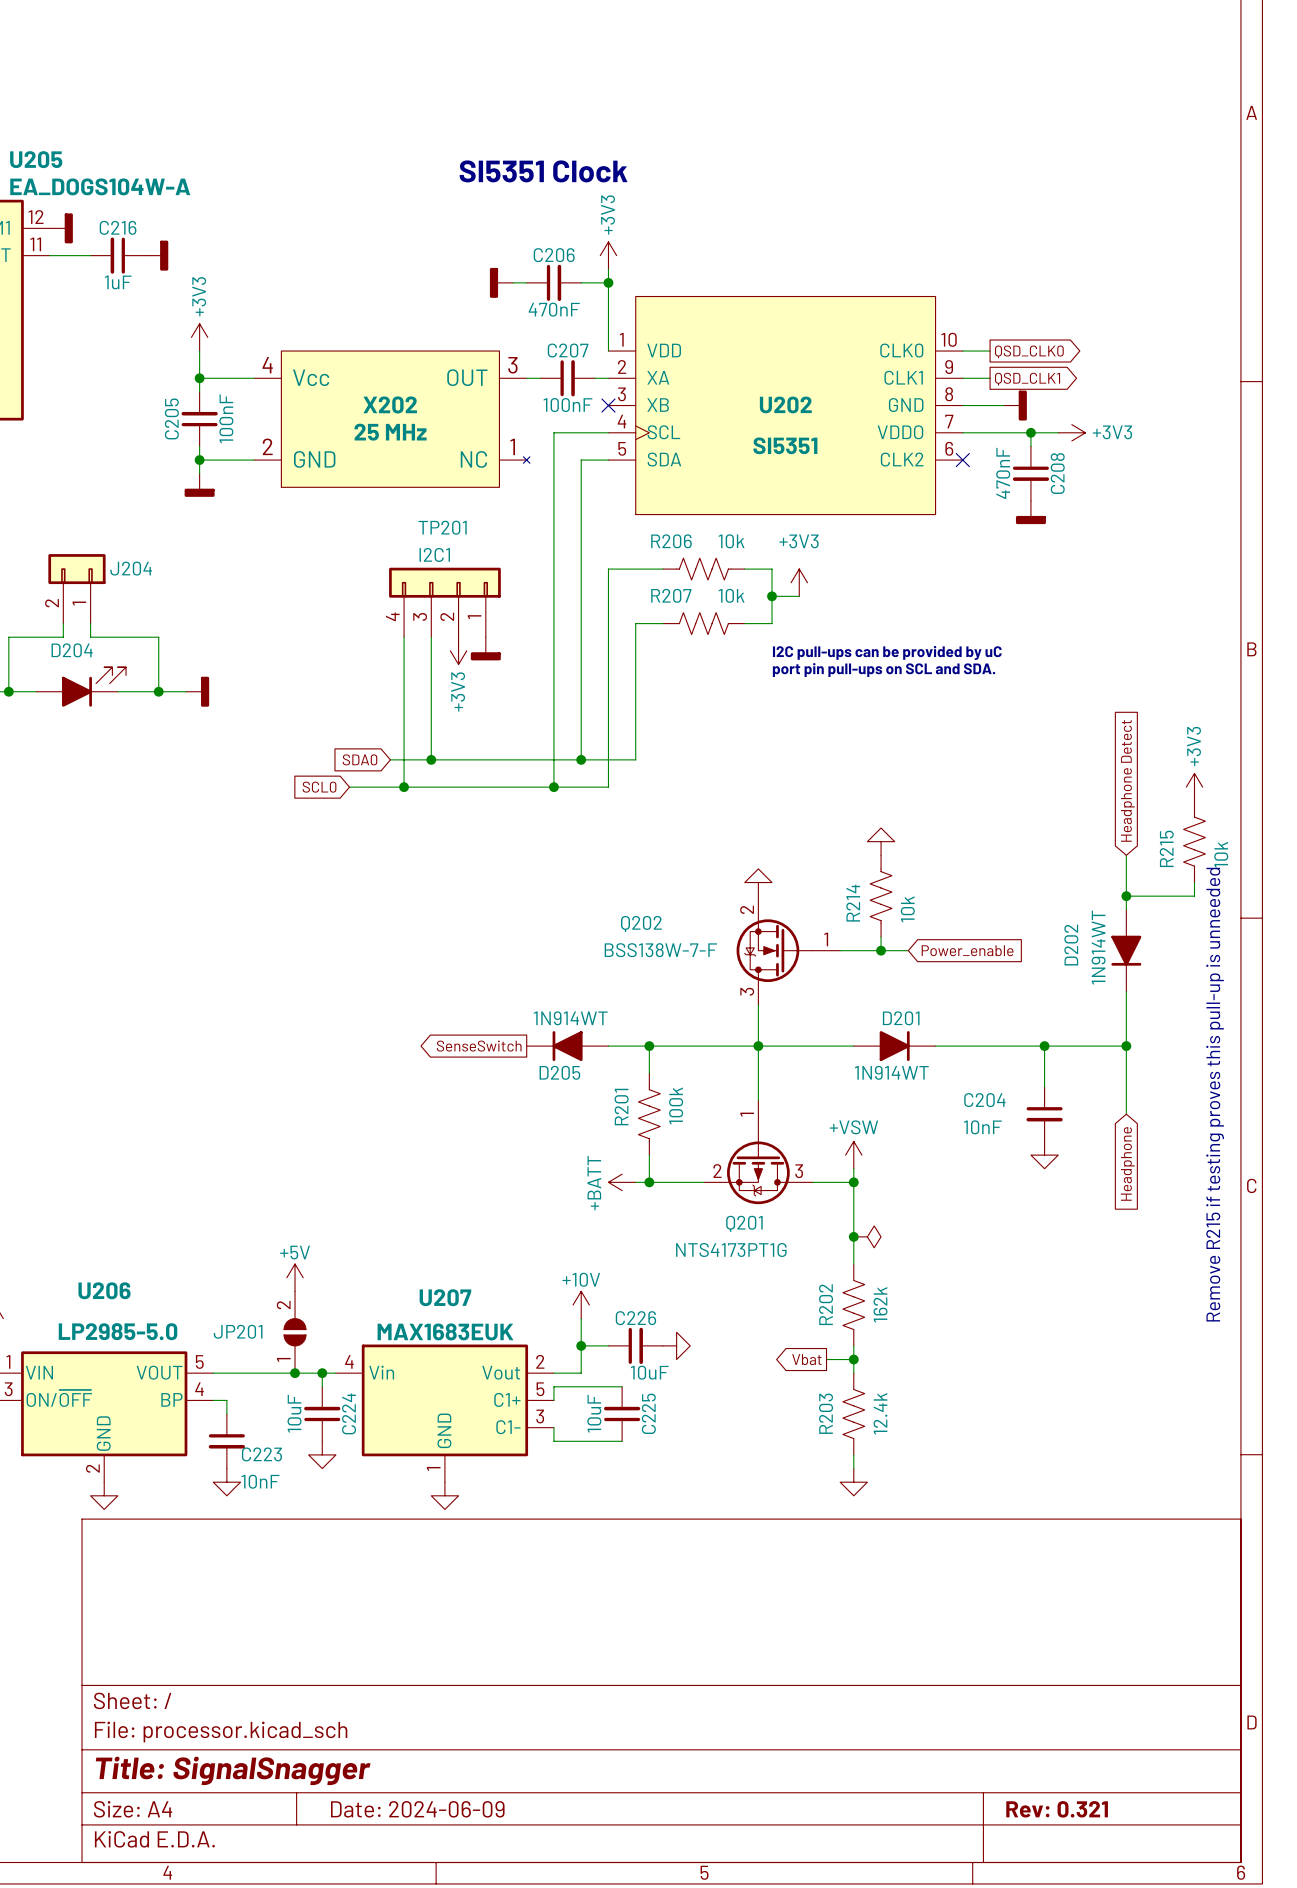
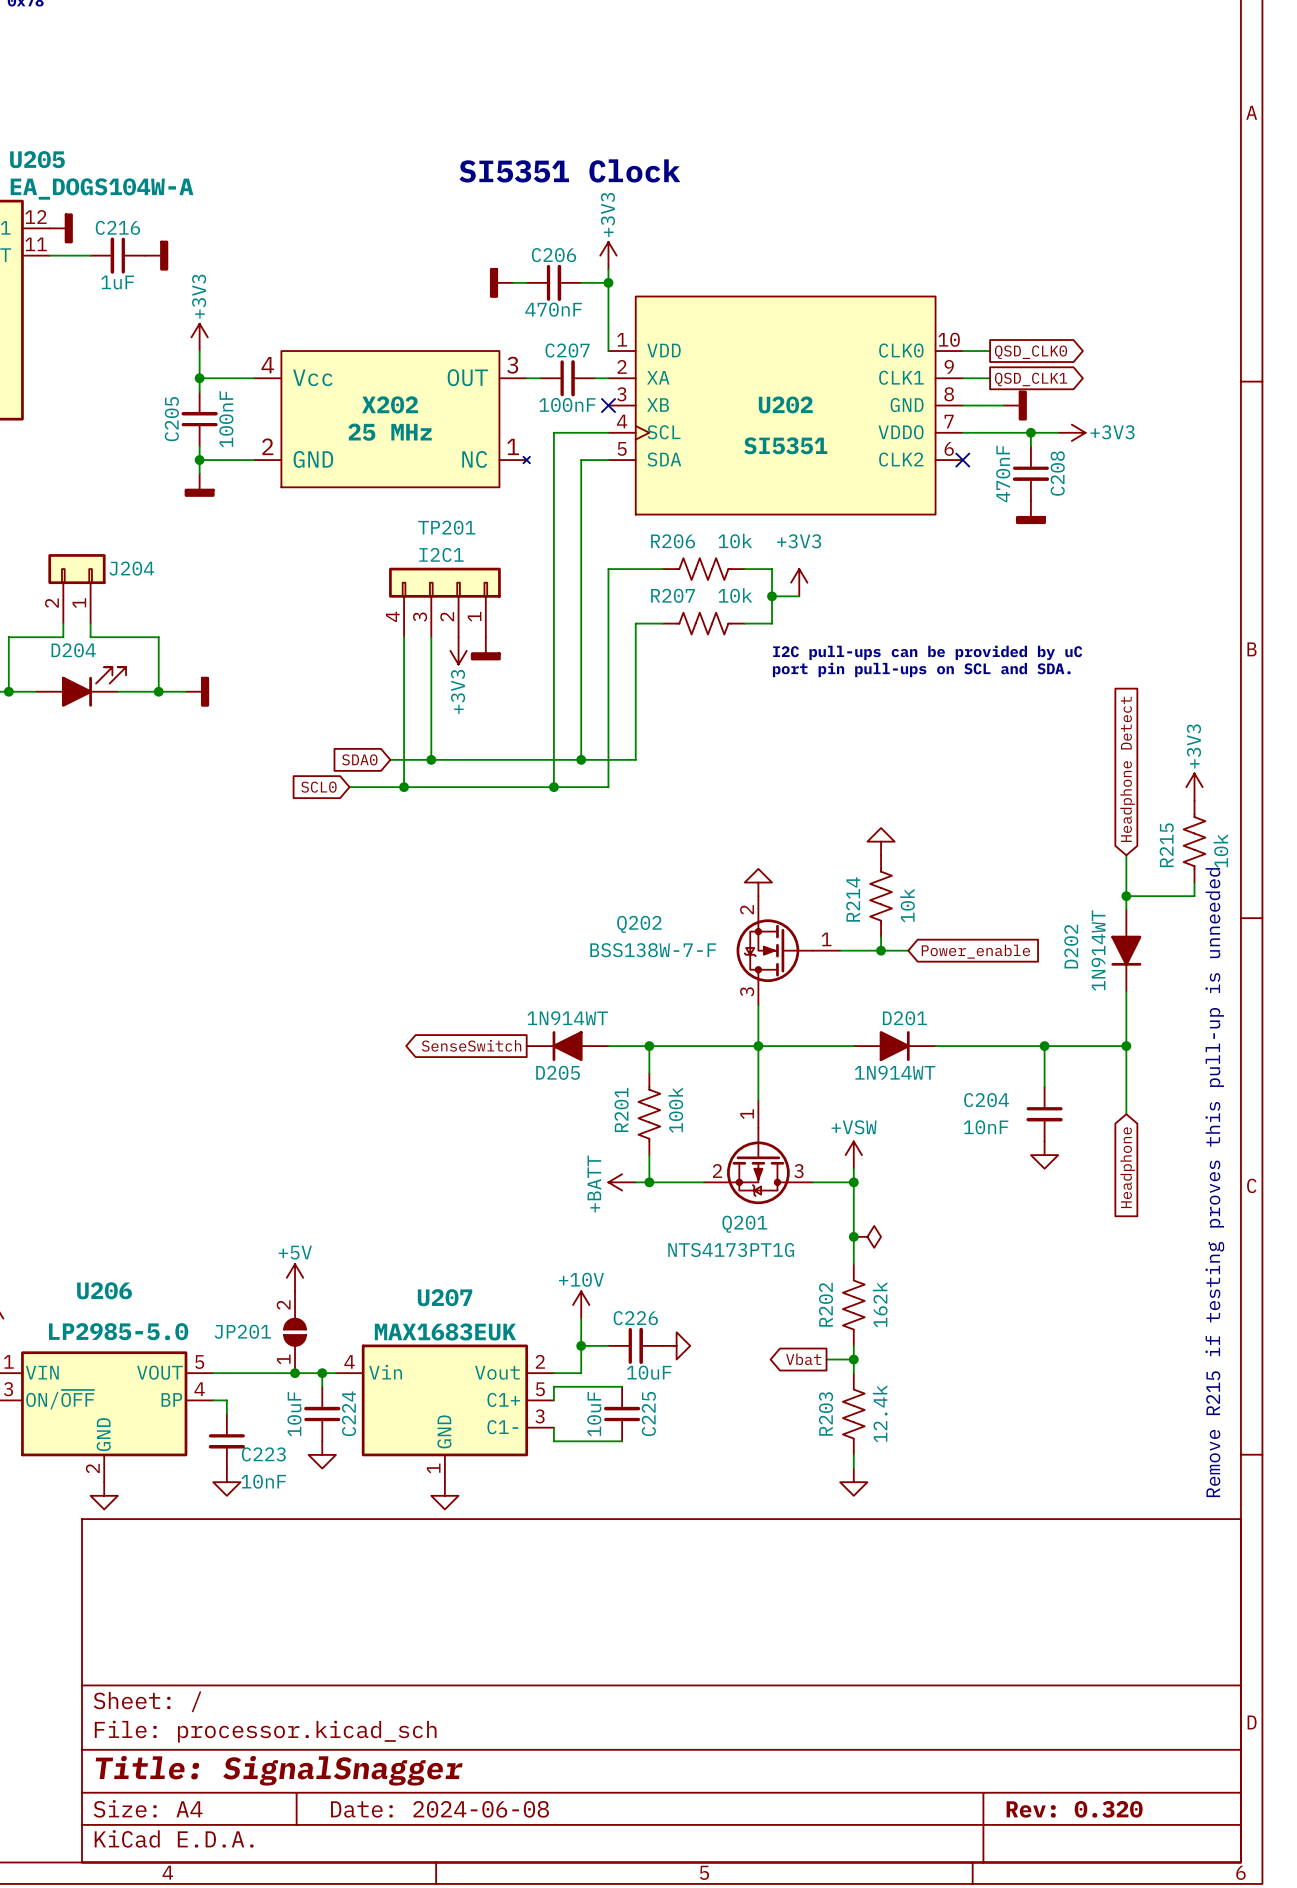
title block: Date: 2024-06-09 (417, 1809) -> Date: 2024-06-08 (439, 1809)
title block: Rev: 0.321 (1057, 1809) -> Rev: 0.320 (1074, 1809)

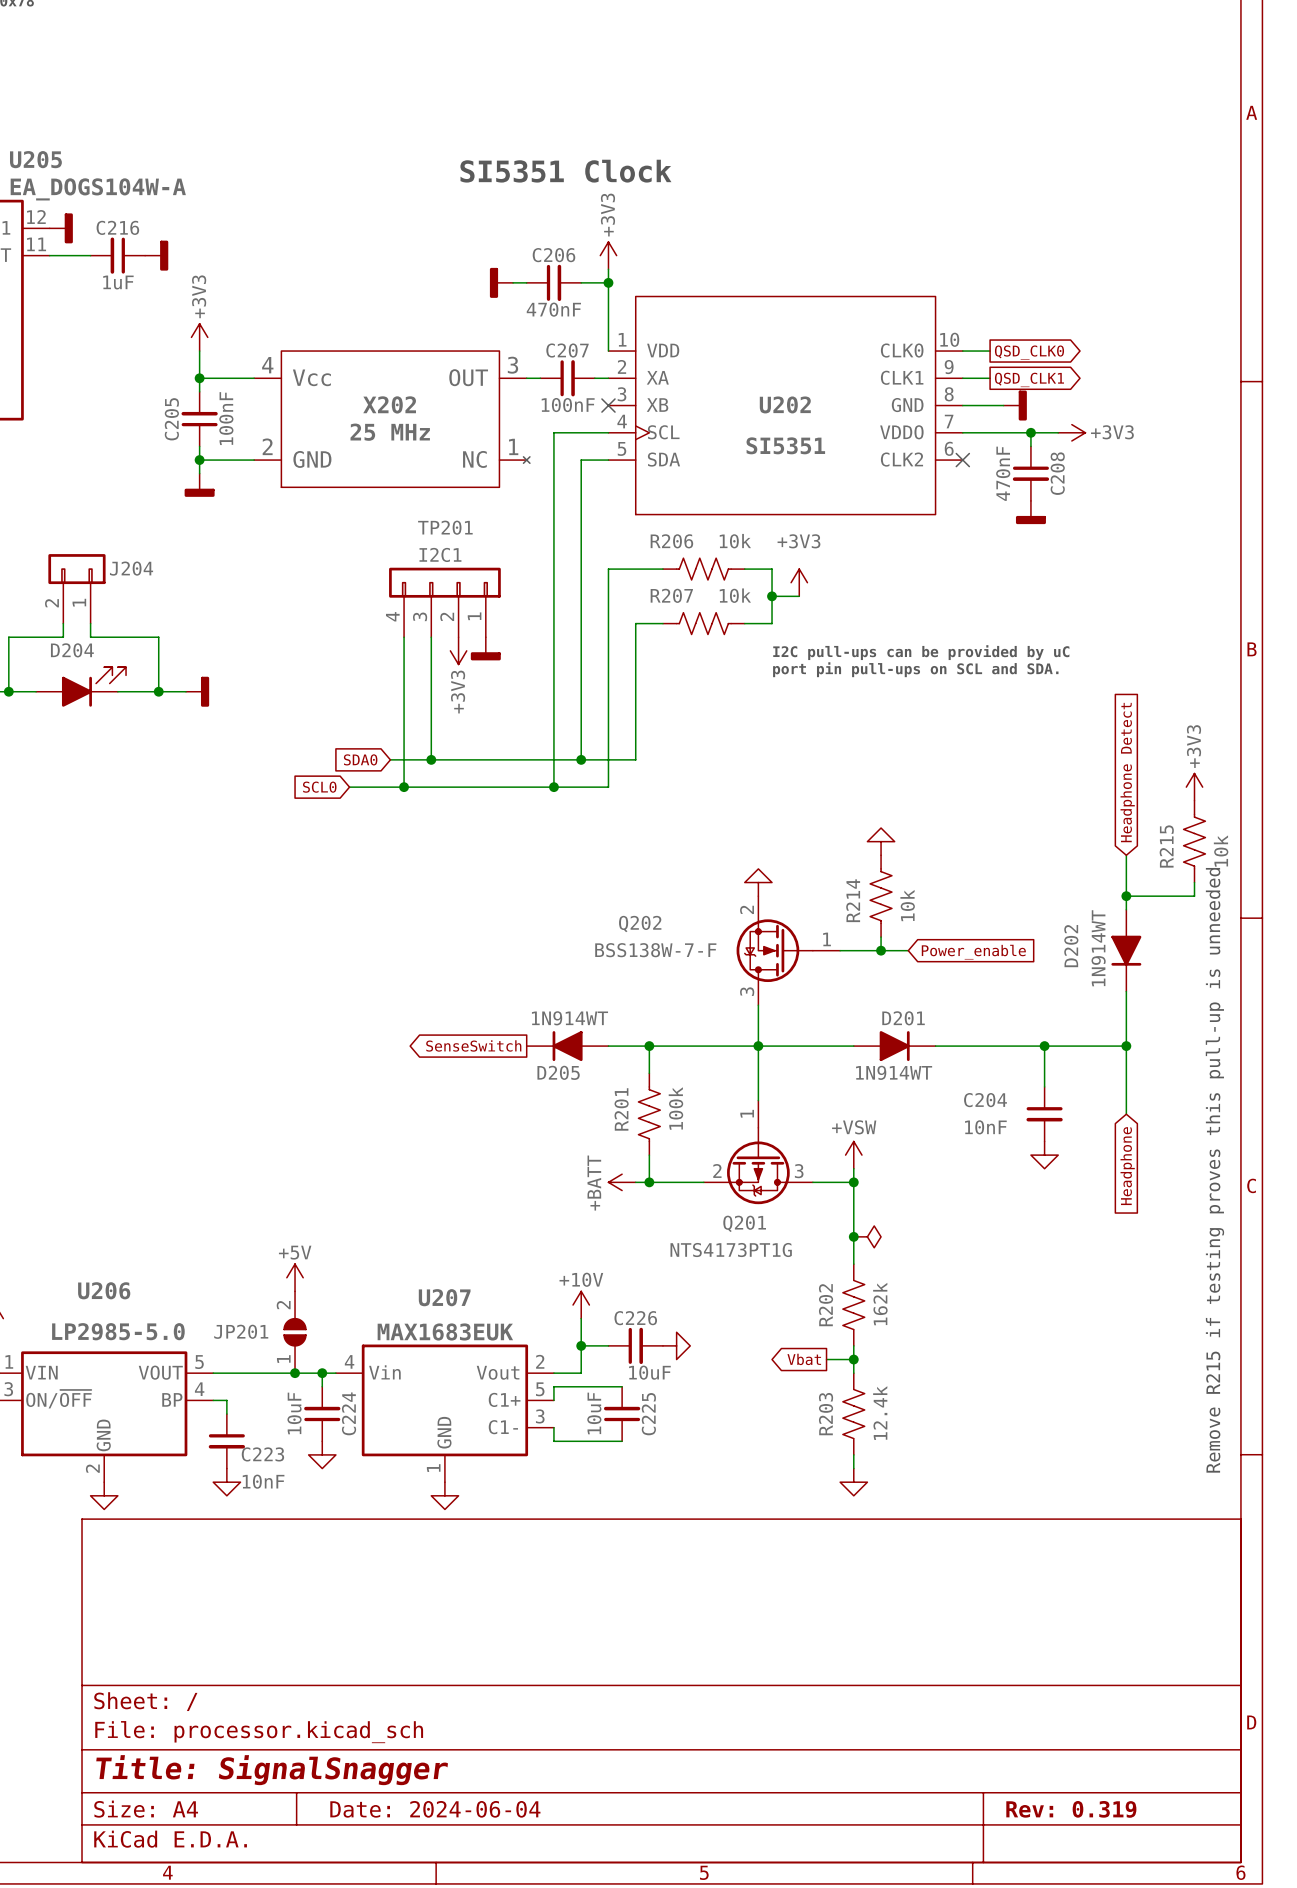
title block: Date: 2024-06-08 (439, 1809) -> Date: 2024-06-04 (435, 1809)
title block: Rev: 0.320 (1074, 1809) -> Rev: 0.319 (1071, 1809)

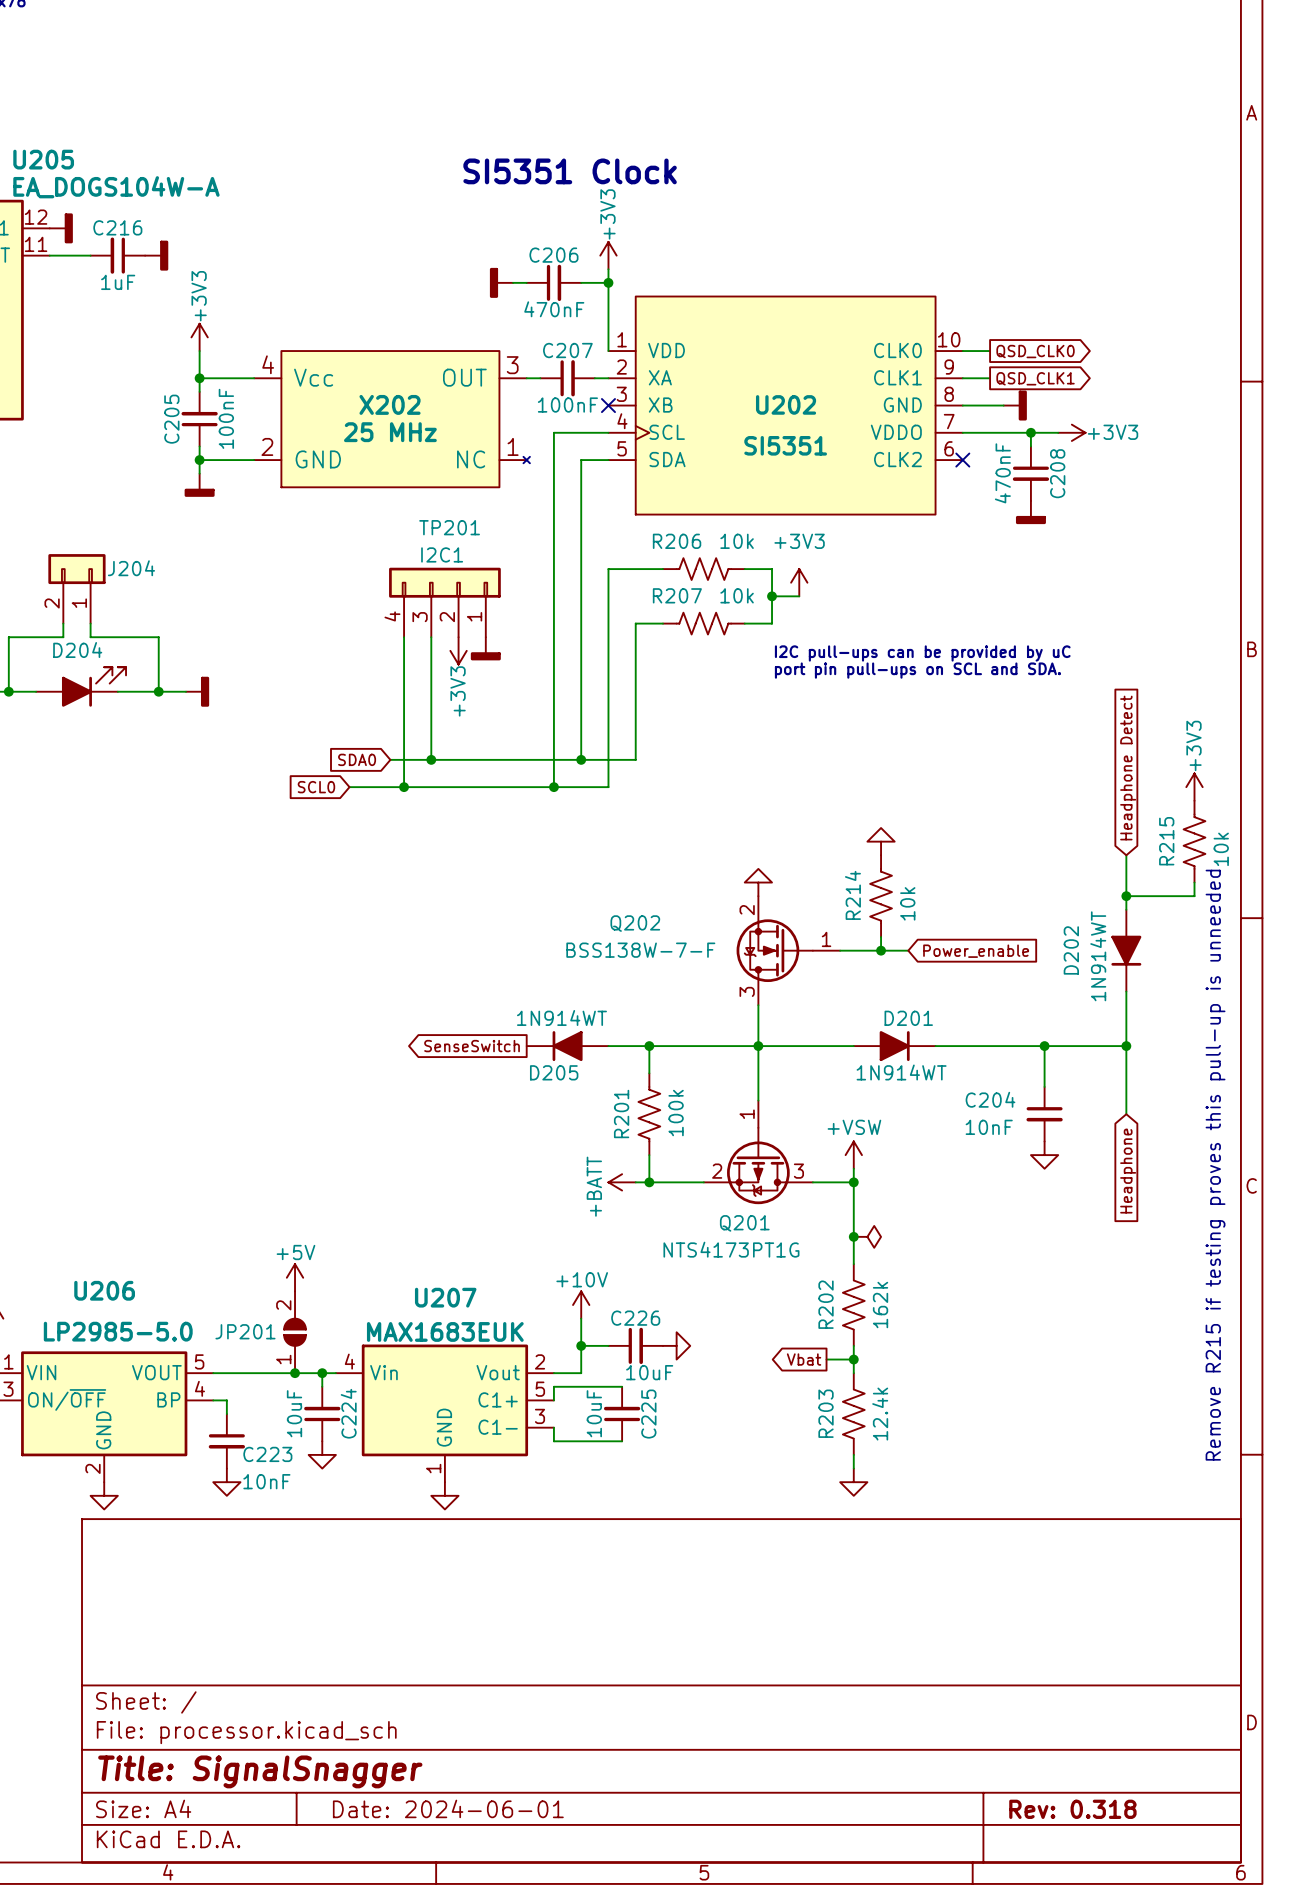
title block: Date: 2024-06-04 (435, 1809) -> Date: 2024-06-01 (448, 1808)
title block: Rev: 0.319 (1071, 1809) -> Rev: 0.318 (1072, 1809)

